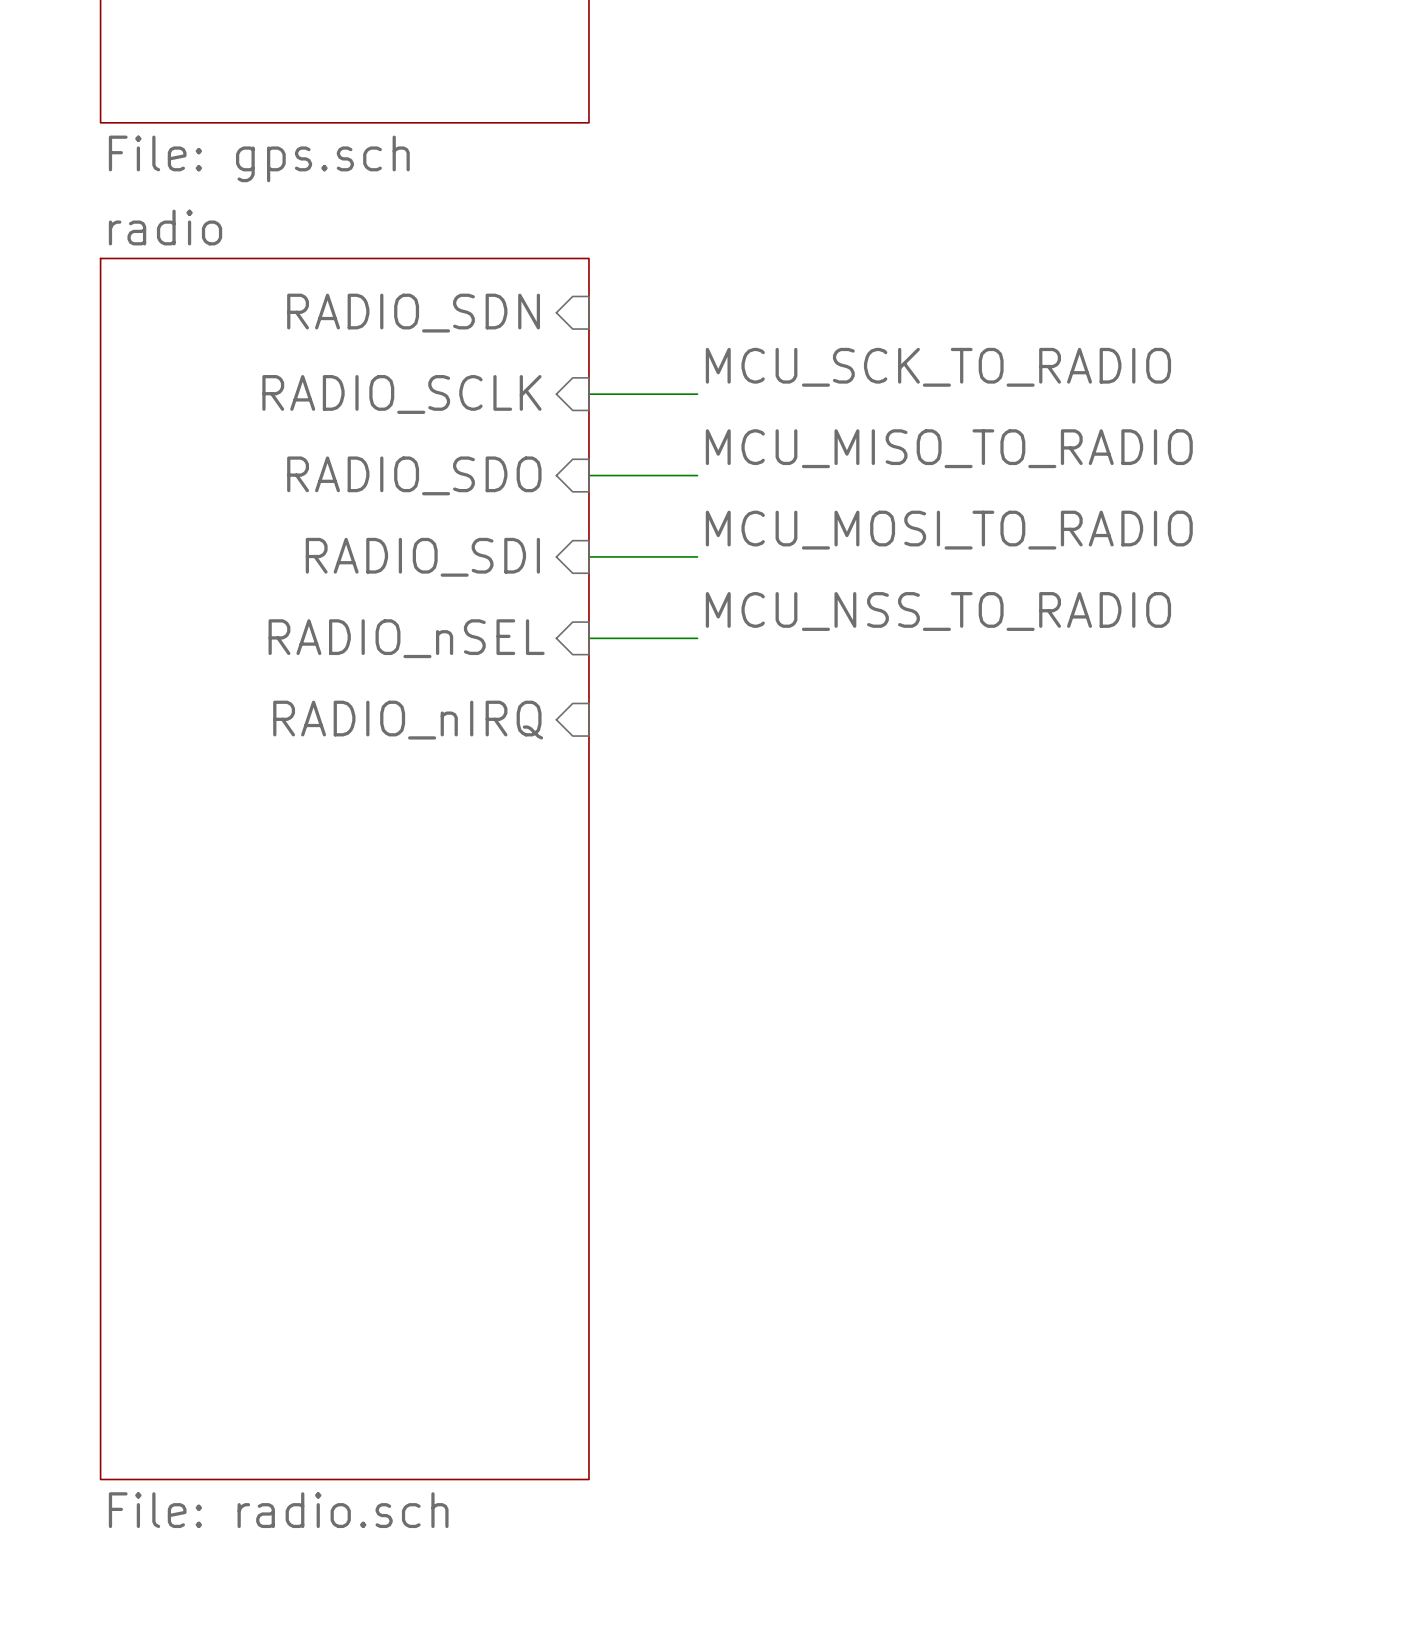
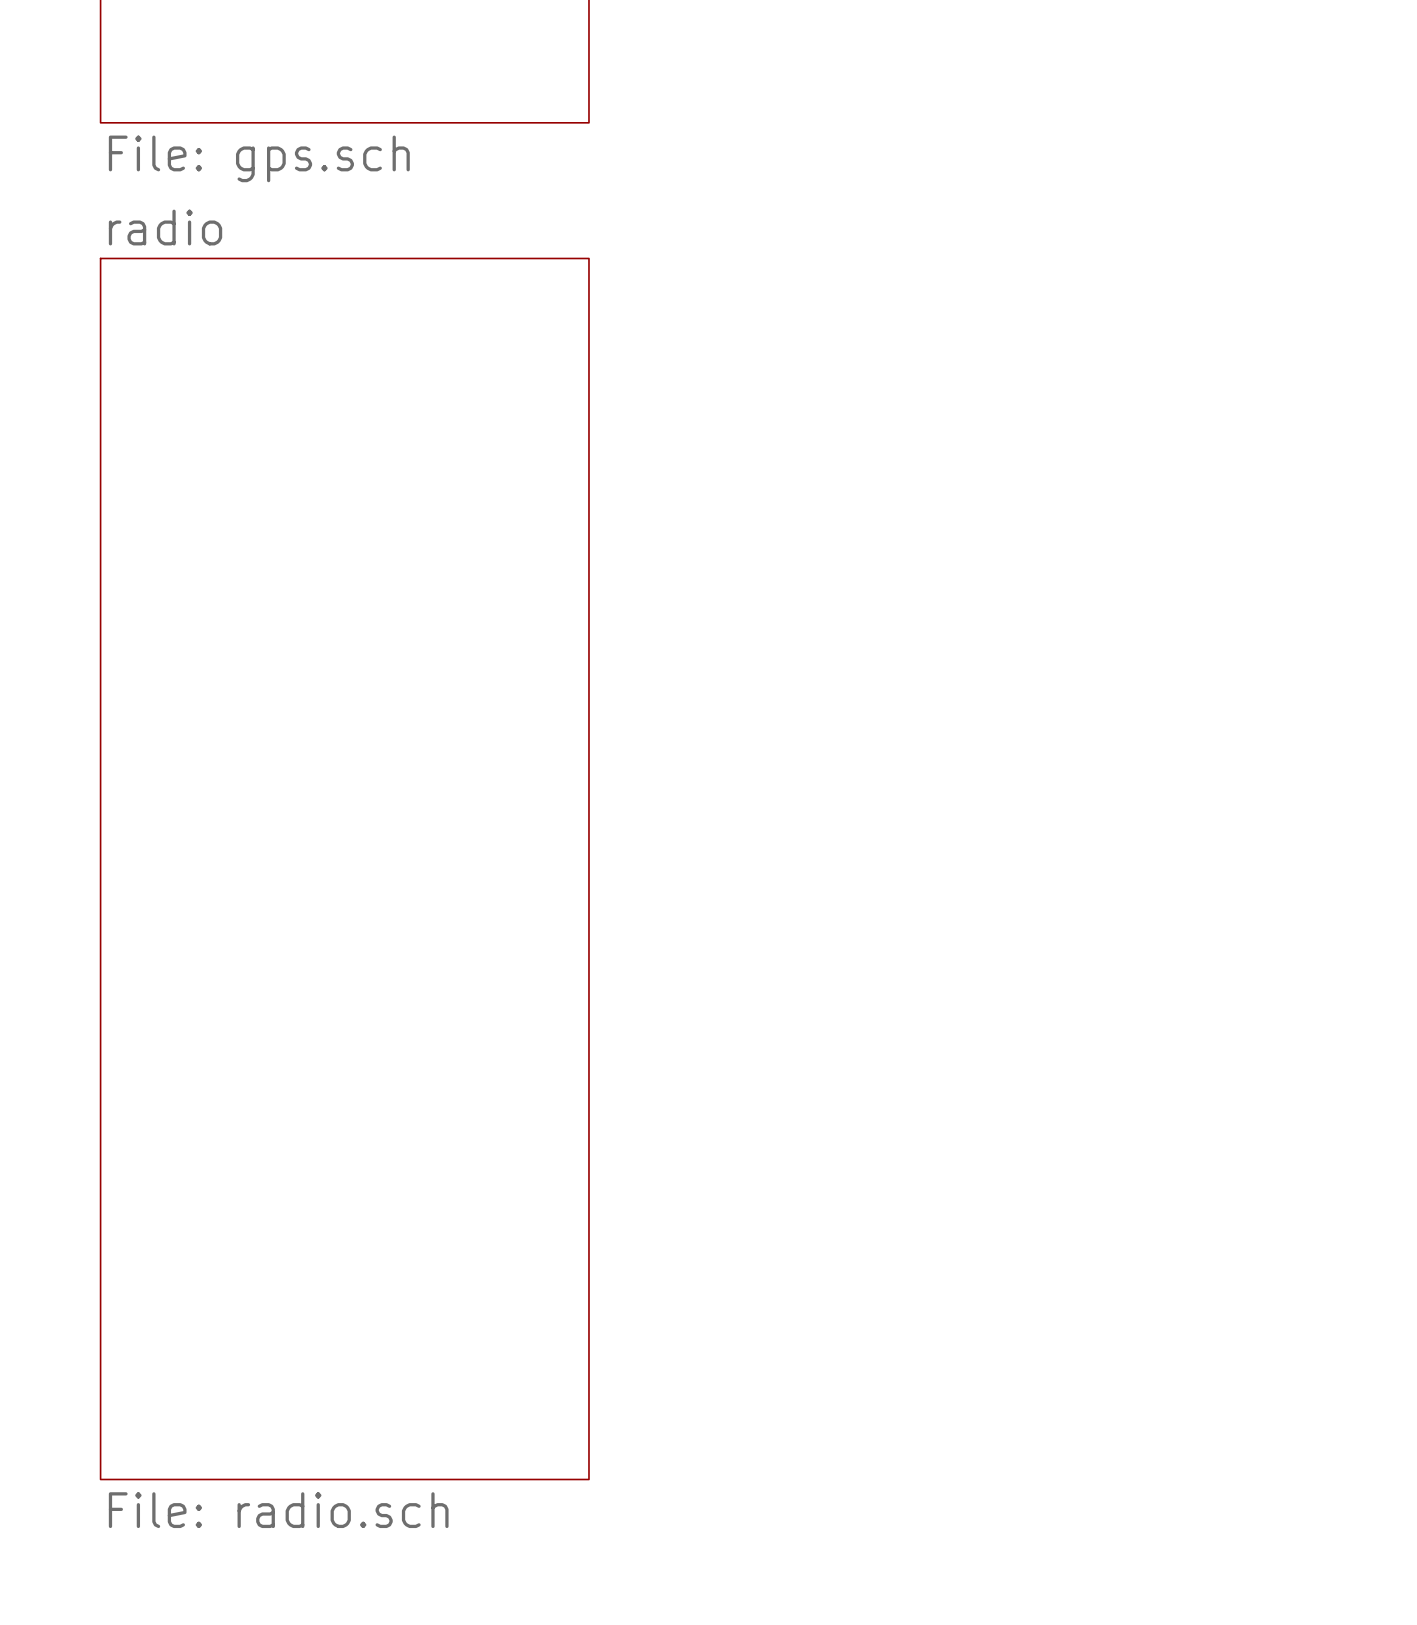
sheet pin: RADIO_SDN (413, 313) -> none
label: MCU_SCK_TO_RADIO (938, 367) -> none
sheet pin: RADIO_SCLK (401, 394) -> none
wire: (588, 394) (697, 394) -> none
label: MCU_MISO_TO_RADIO (949, 448) -> none
sheet pin: RADIO_SDO (414, 475) -> none
wire: (588, 475) (697, 475) -> none
label: MCU_MOSI_TO_RADIO (949, 530) -> none
wire: (588, 556) (697, 556) -> none
sheet pin: RADIO_SDI (422, 557) -> none
label: MCU_NSS_TO_RADIO (938, 611) -> none
sheet pin: RADIO_nSEL (406, 638) -> none
wire: (588, 638) (697, 638) -> none
sheet pin: RADIO_nIRQ (408, 720) -> none

